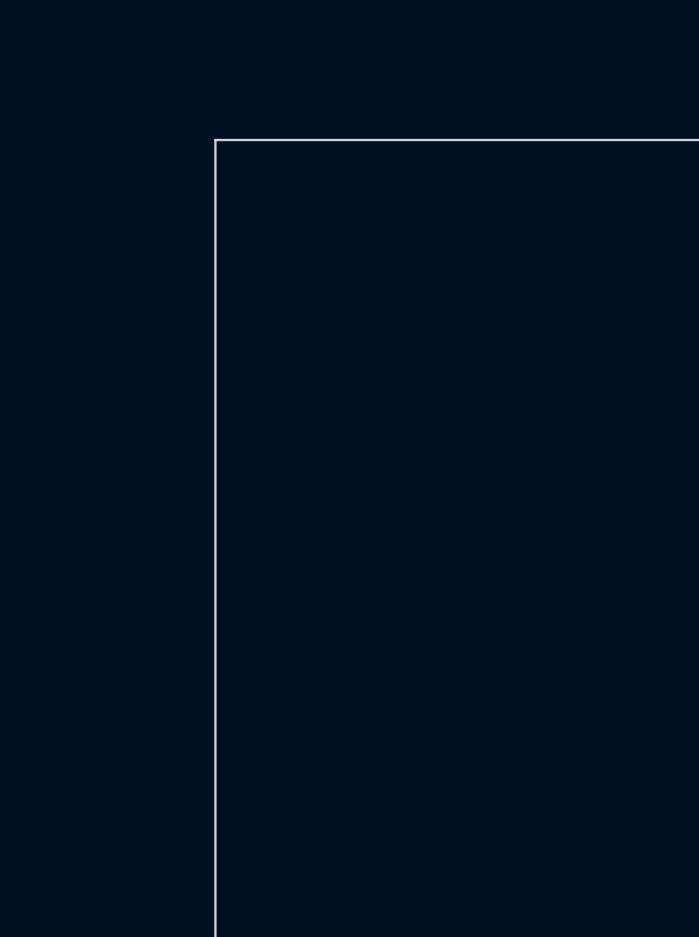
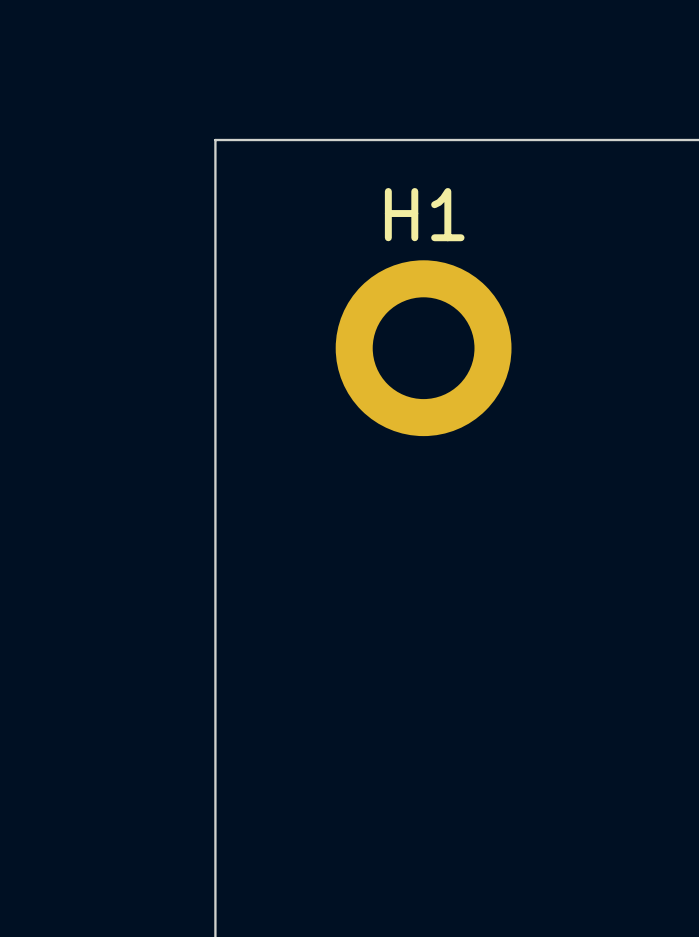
H1: none -> (423, 348)

